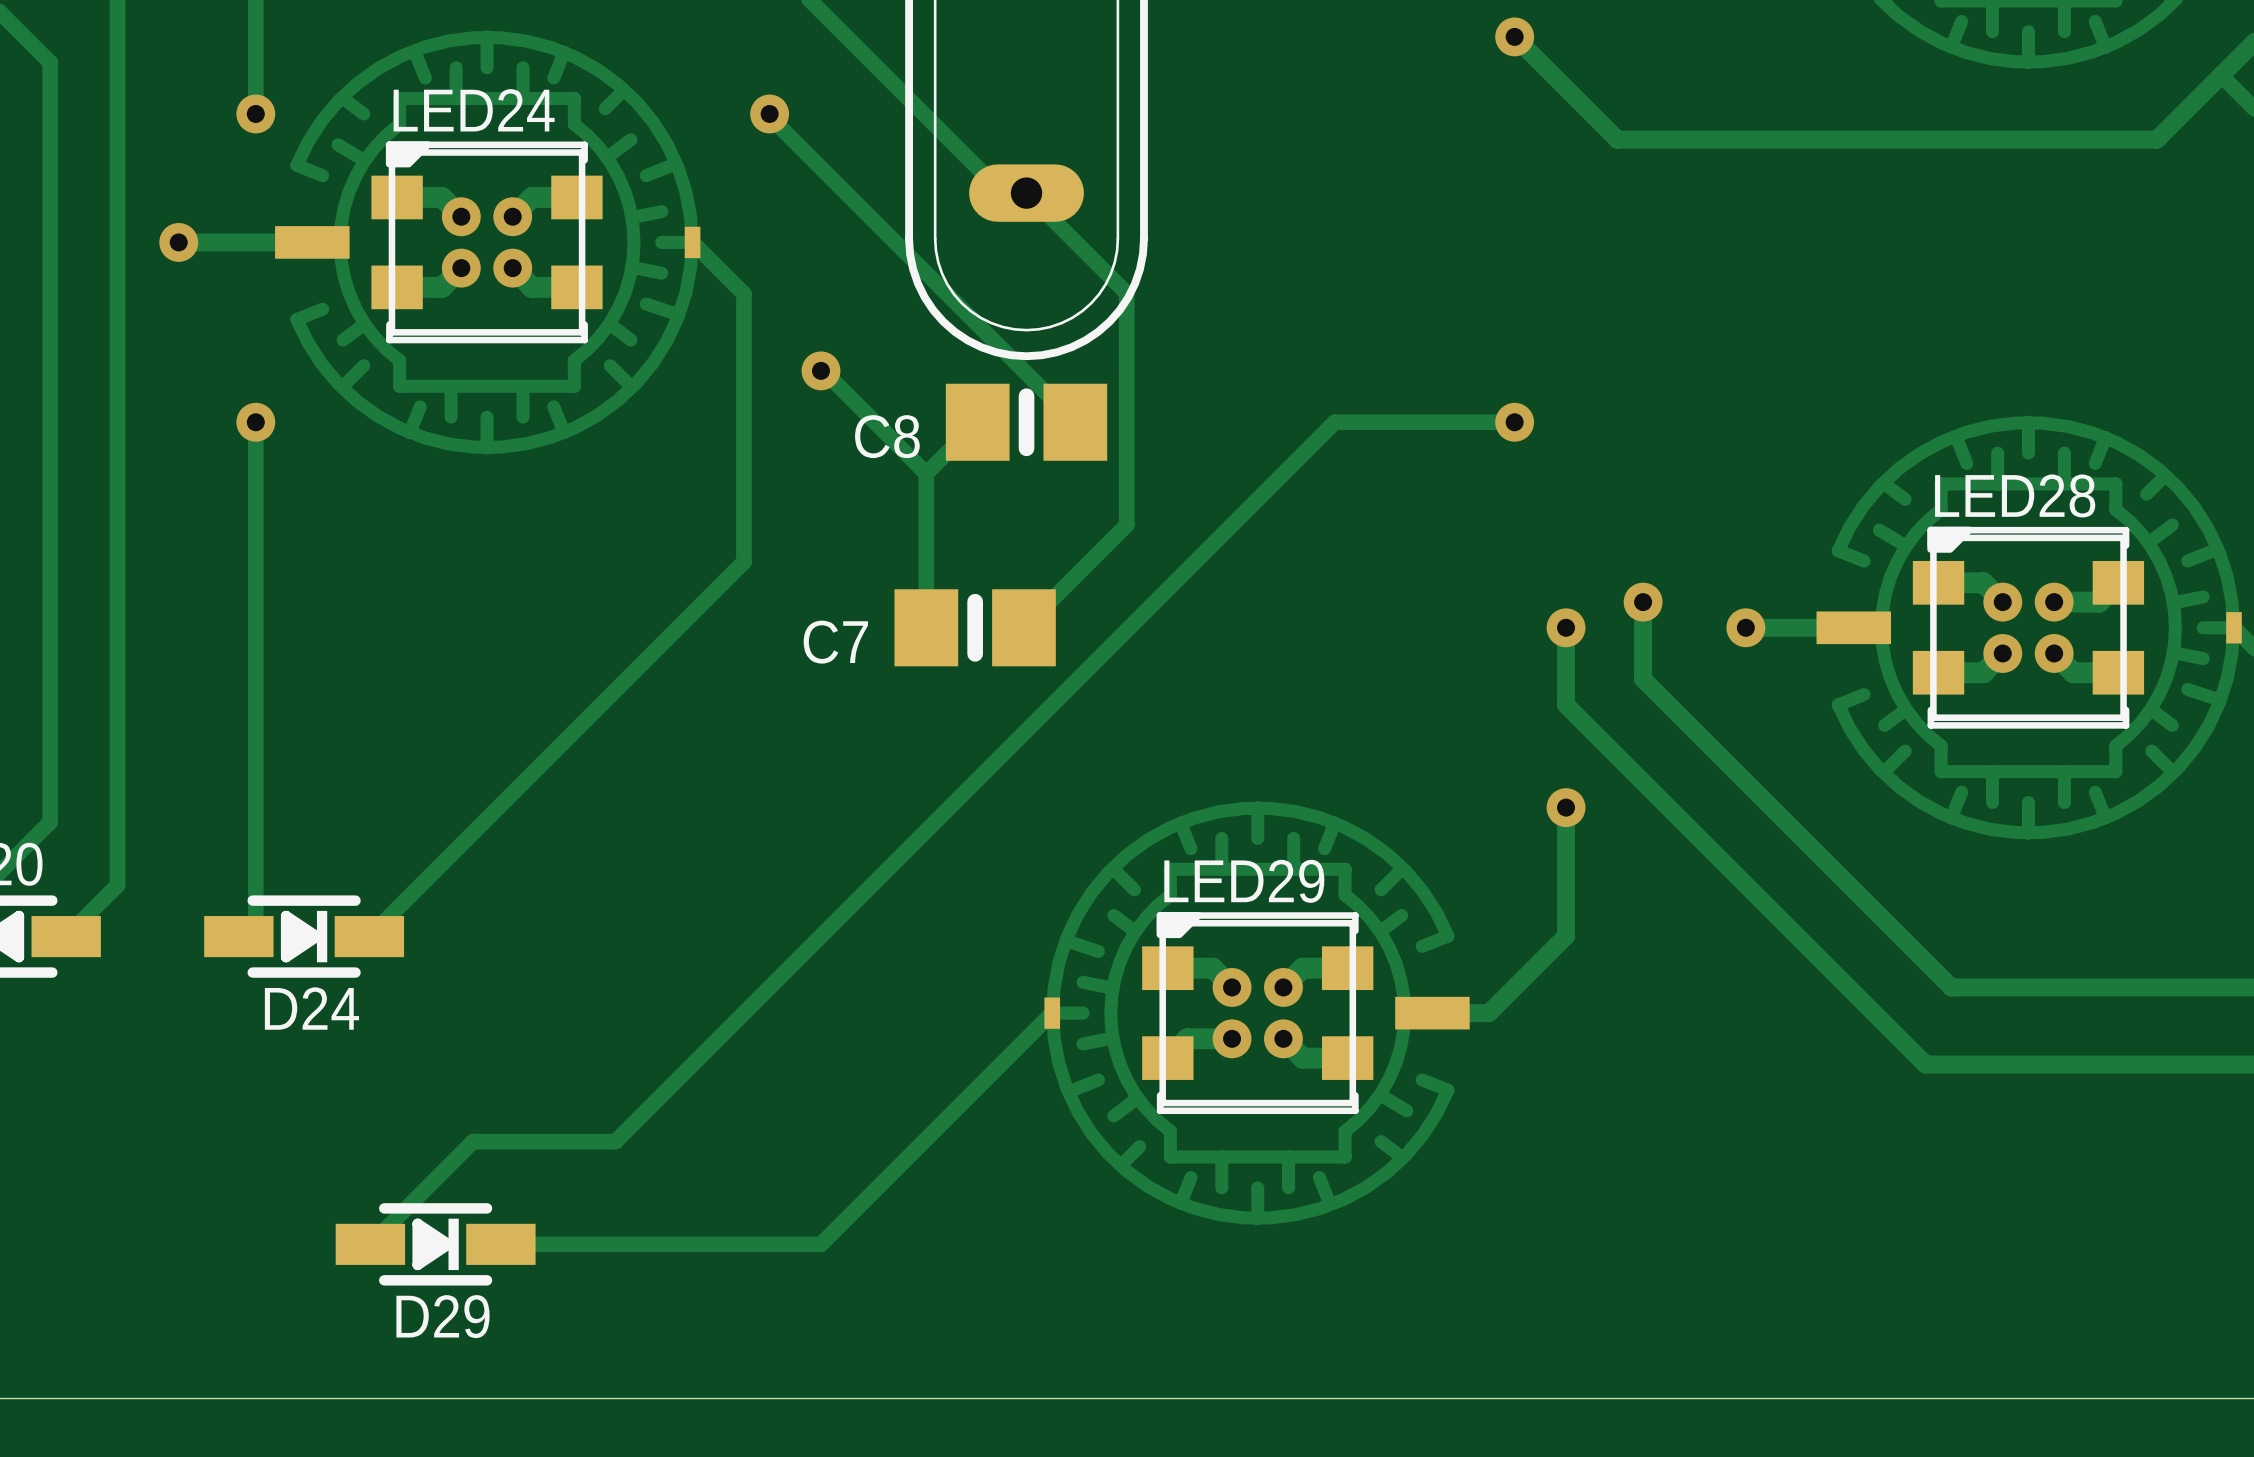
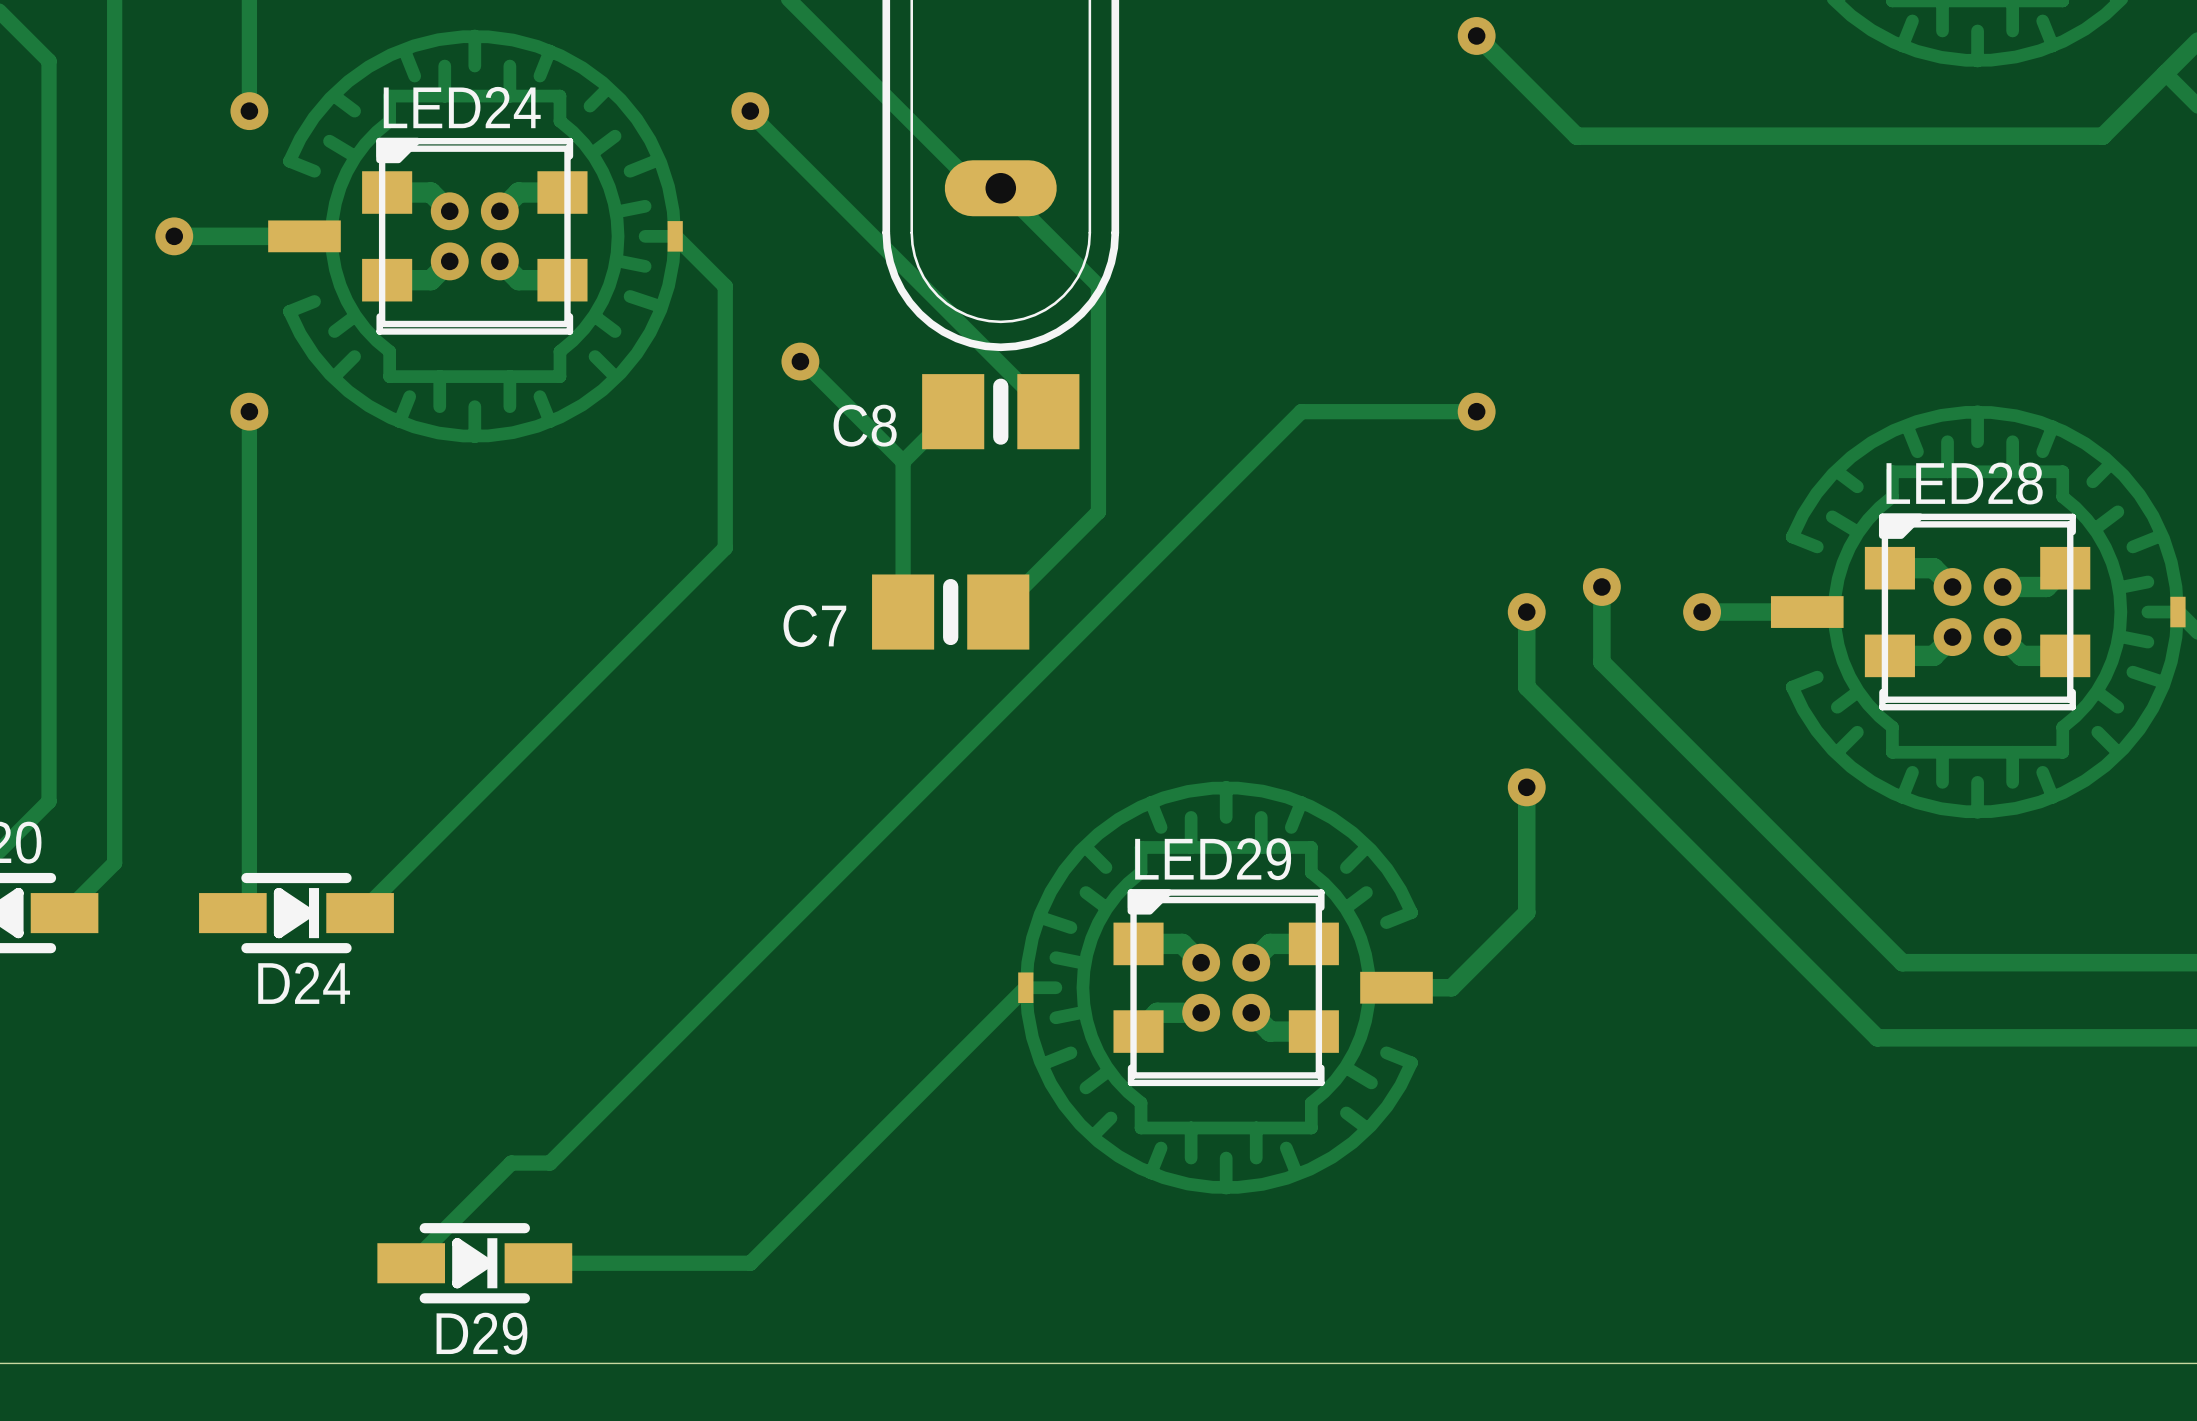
track: (615, 1141) (473, 1141) (370, 1244) -> (600, 1112) (549, 1163) (511, 1163) (411, 1263)
D29 position: (435, 1244) -> (474, 1263)
track: (821, 1244) (500, 1244) -> (800, 1213) (750, 1263) (538, 1263)

